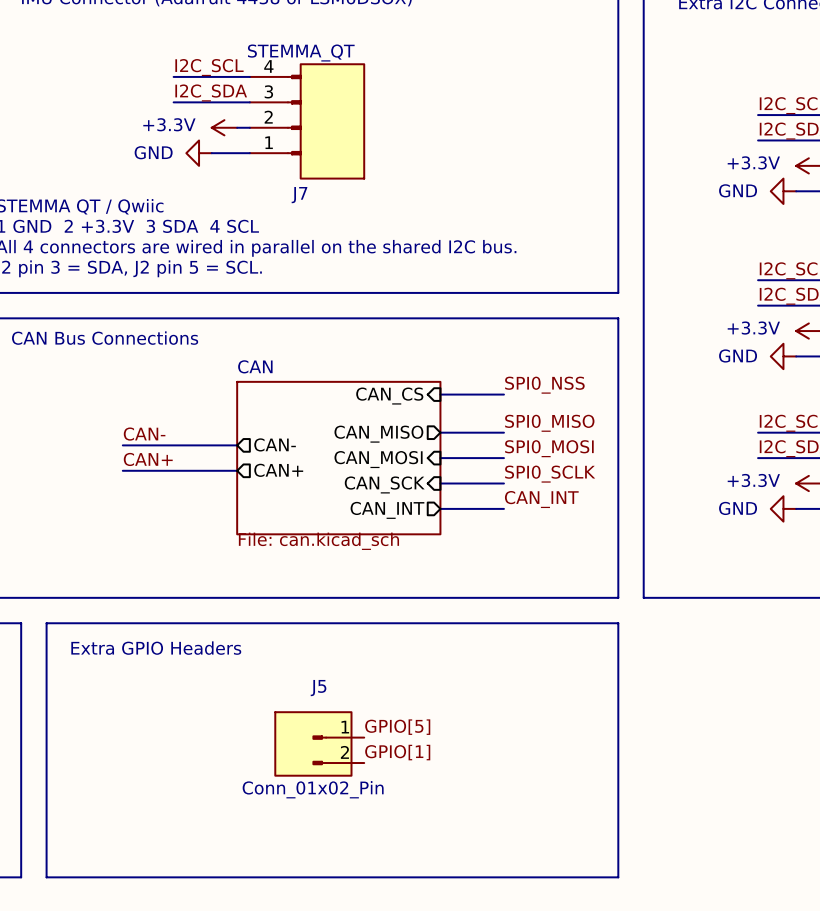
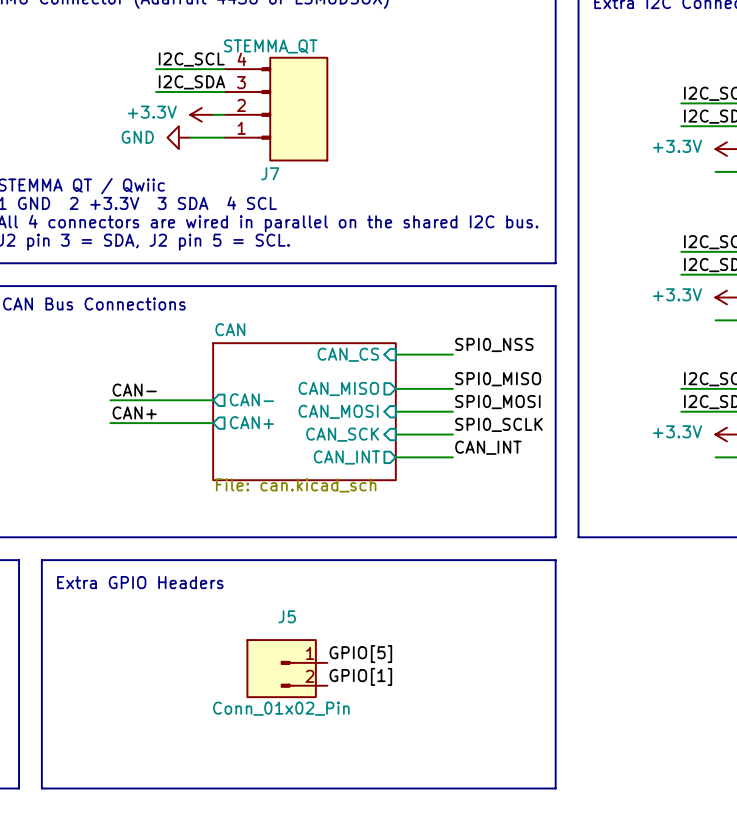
power symbol: GND (783, 191) -> none
power symbol: GND (783, 356) -> none
power symbol: GND (783, 508) -> none

